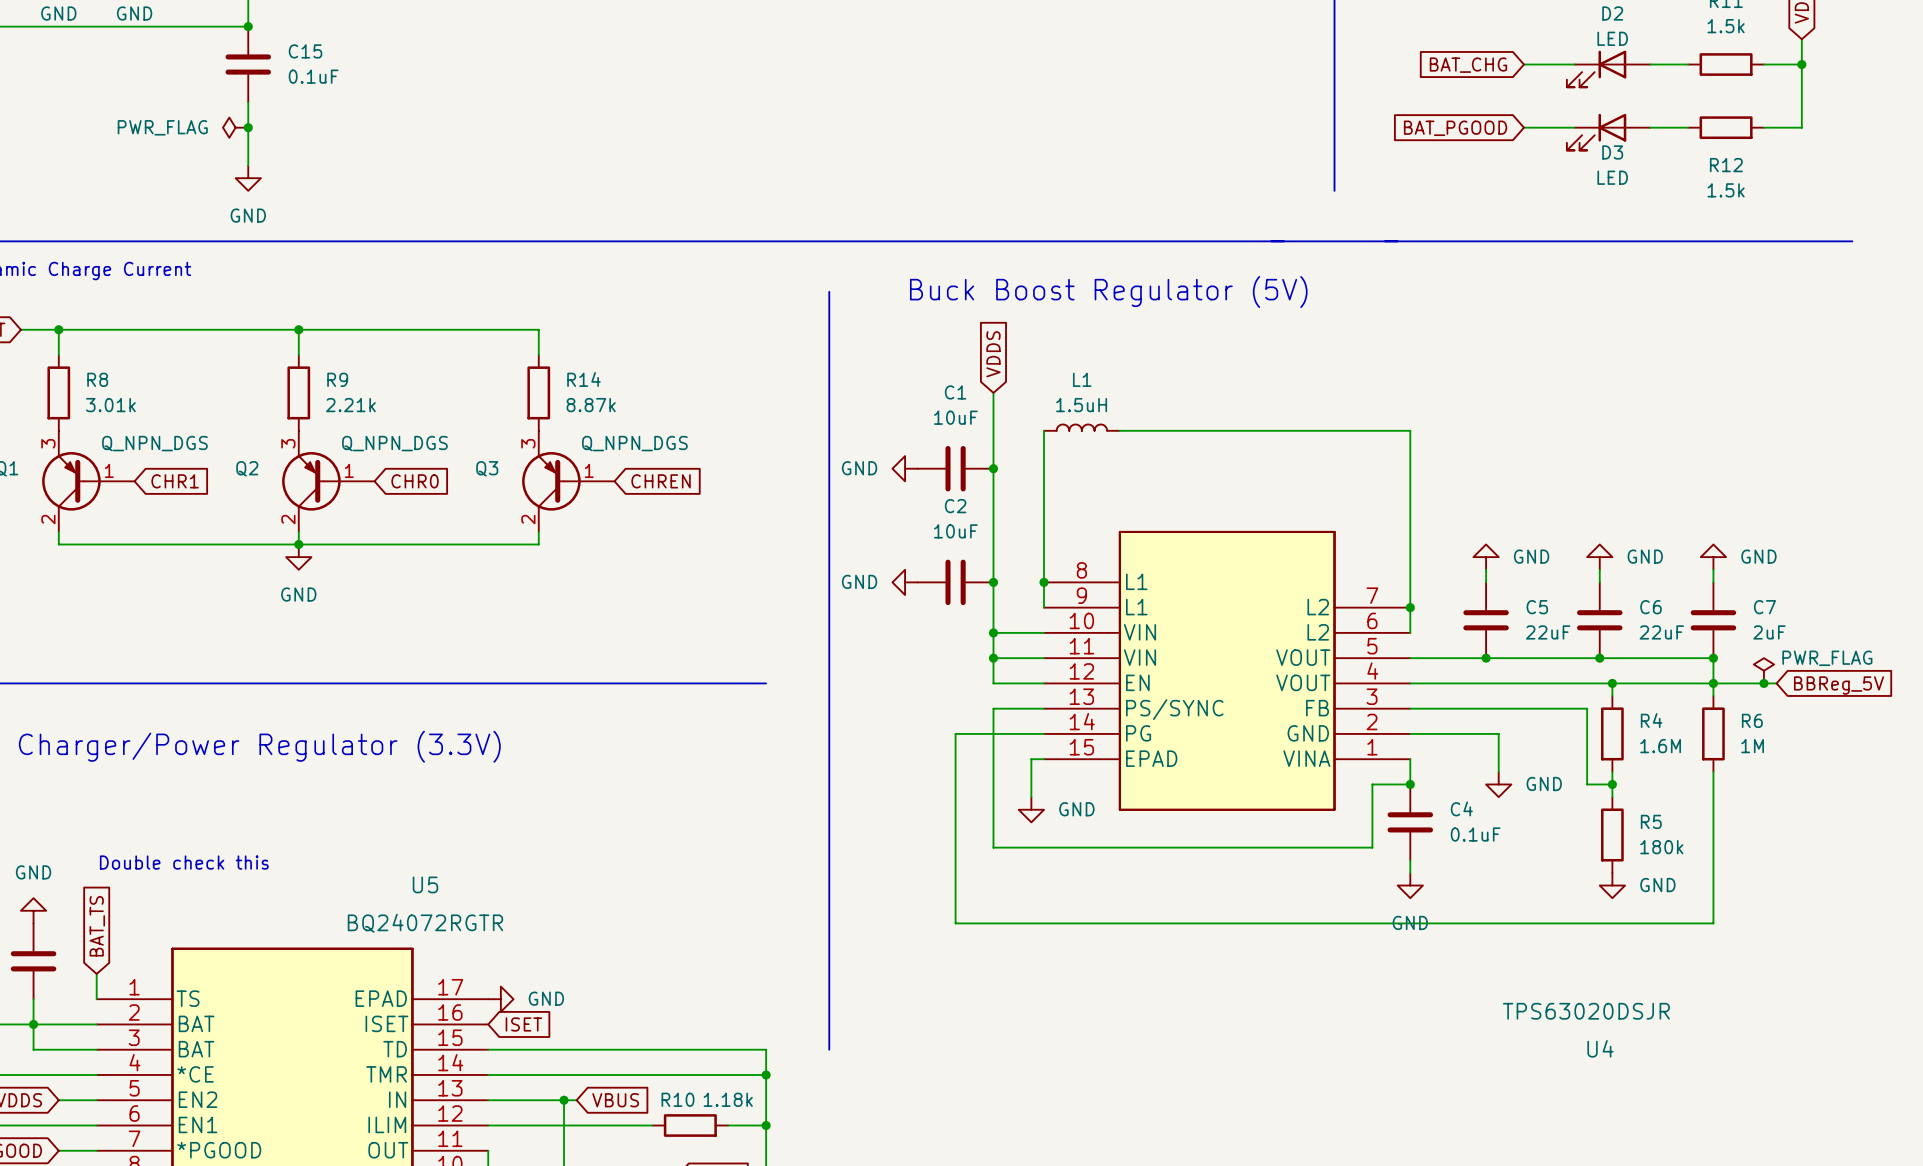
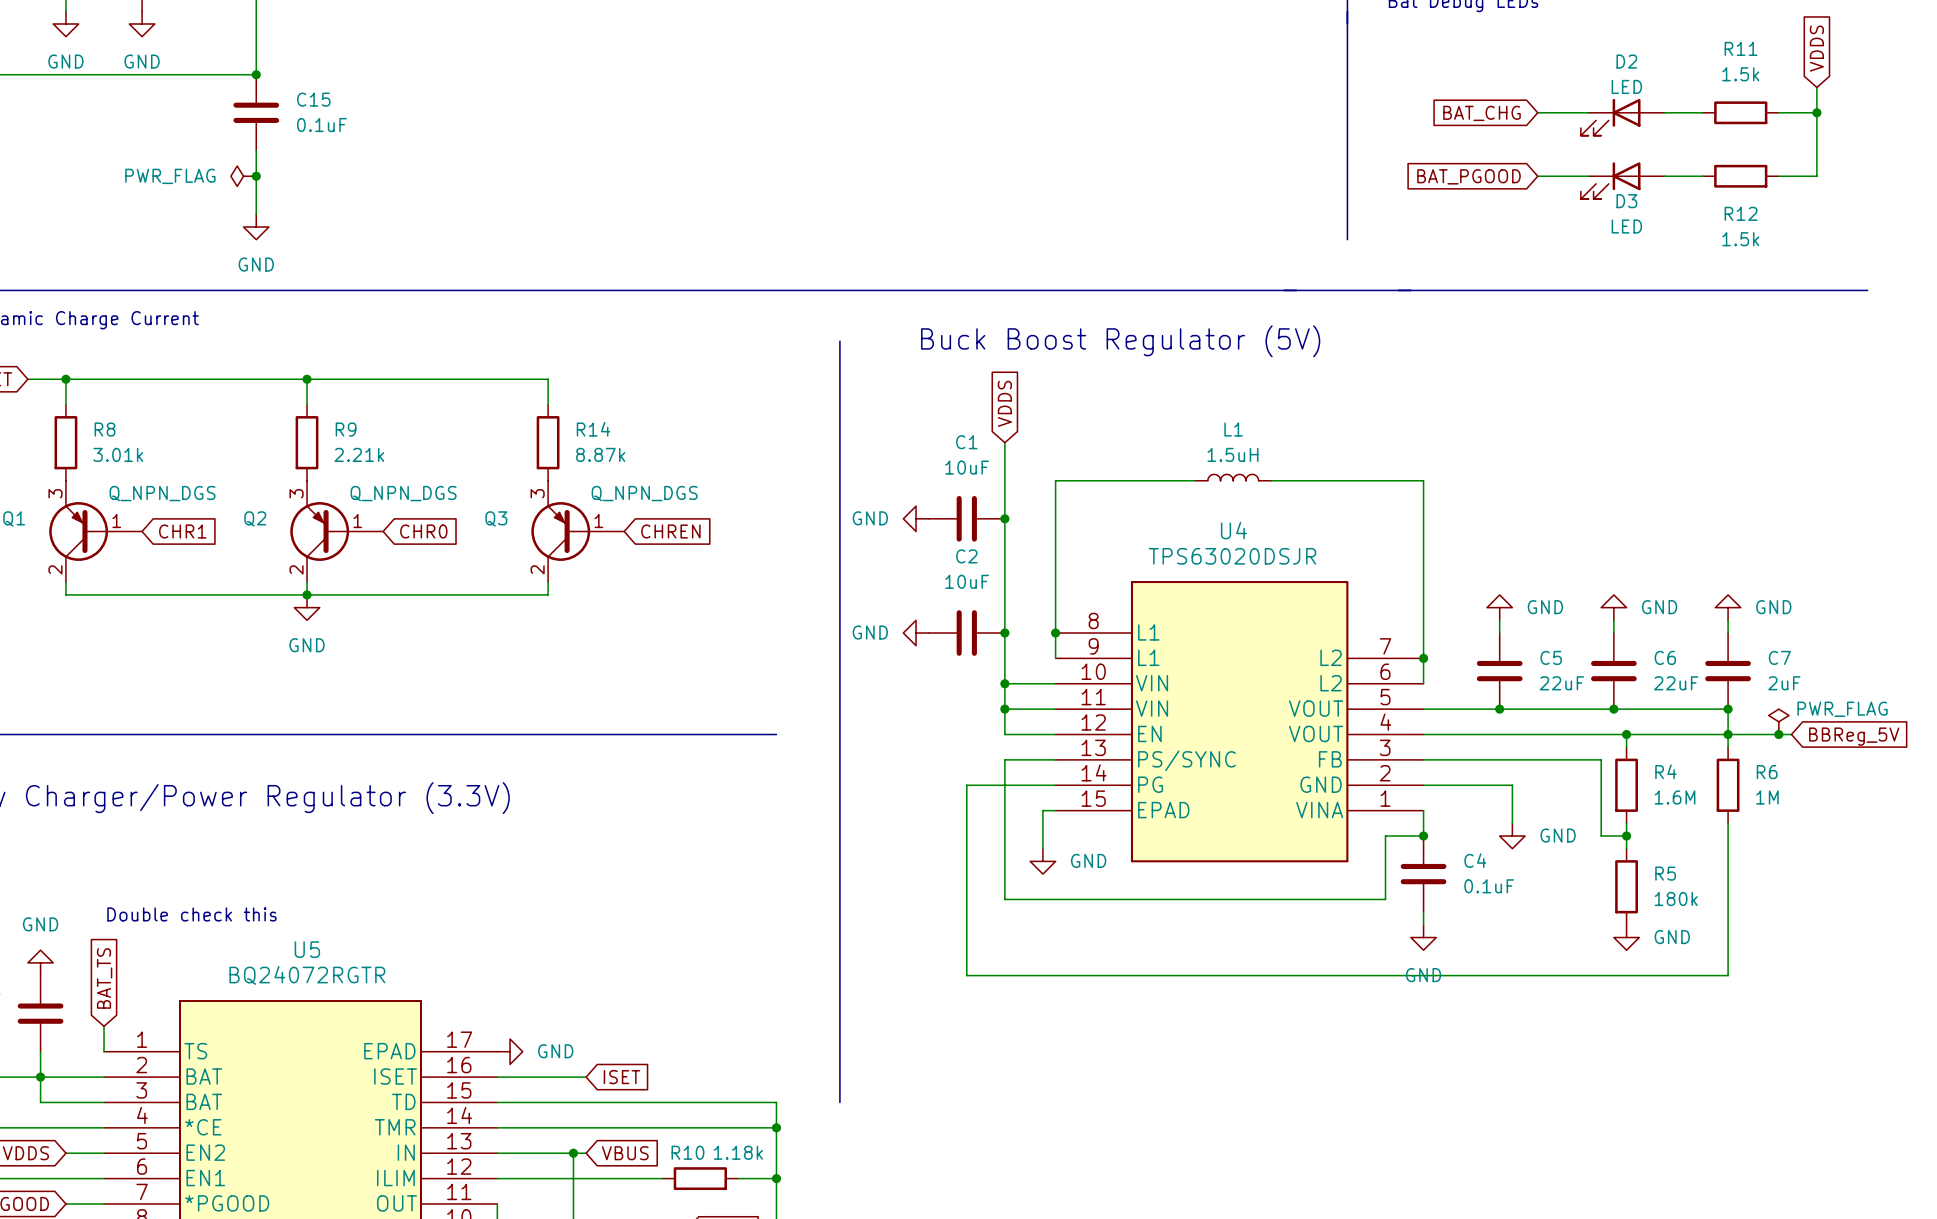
L1 position: (1081, 427) -> (1233, 477)
wire: (1182, 430) (1258, 430) -> (1055, 480) (1131, 480)
U5 name position: U5 (425, 884) -> U5 (307, 949)
U5 value position: BQ24072RGTR (425, 923) -> BQ24072RGTR (307, 975)
U4 value position: TPS63020DSJR (1586, 1011) -> TPS63020DSJR (1232, 556)
wire: none -> (497, 1077) (586, 1077)
global label position: ISET (523, 1024) -> ISET (621, 1077)
U4 name position: U4 (1600, 1048) -> U4 (1233, 530)

